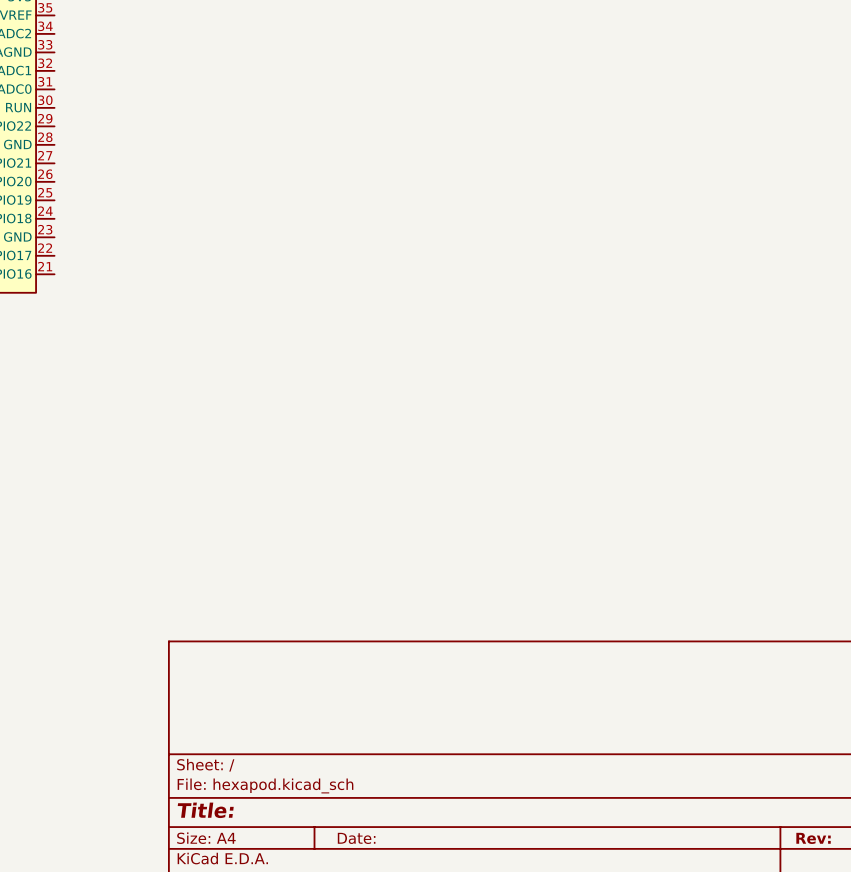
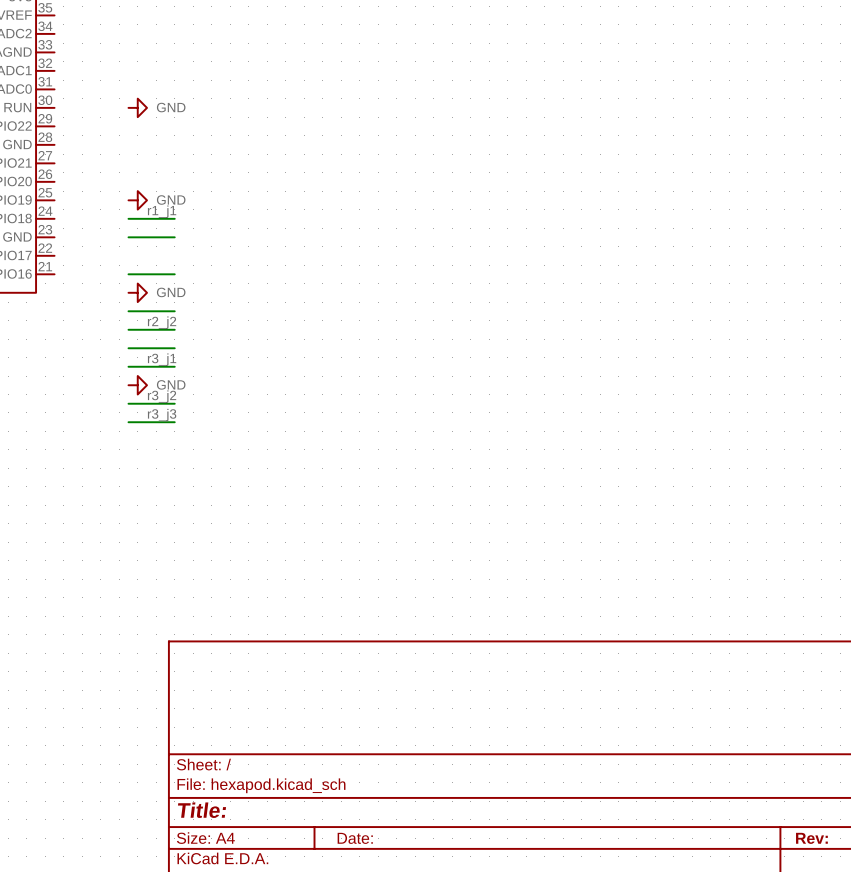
power symbol: none -> GND (137, 107)
power symbol: none -> GND (137, 200)
label: none -> r1_j1 (162, 211)
wire: none -> (128, 218) (174, 218)
wire: none -> (128, 237) (174, 237)
wire: none -> (128, 274) (174, 274)
power symbol: none -> GND (137, 292)
wire: none -> (128, 311) (174, 311)
label: none -> r2_j2 (162, 322)
wire: none -> (128, 329) (174, 329)
wire: none -> (128, 348) (174, 348)
label: none -> r3_j1 (162, 359)
wire: none -> (128, 366) (174, 366)
power symbol: none -> GND (137, 385)
label: none -> r3_j2 (162, 396)
wire: none -> (128, 403) (174, 403)
label: none -> r3_j3 (162, 415)
wire: none -> (128, 422) (174, 422)

